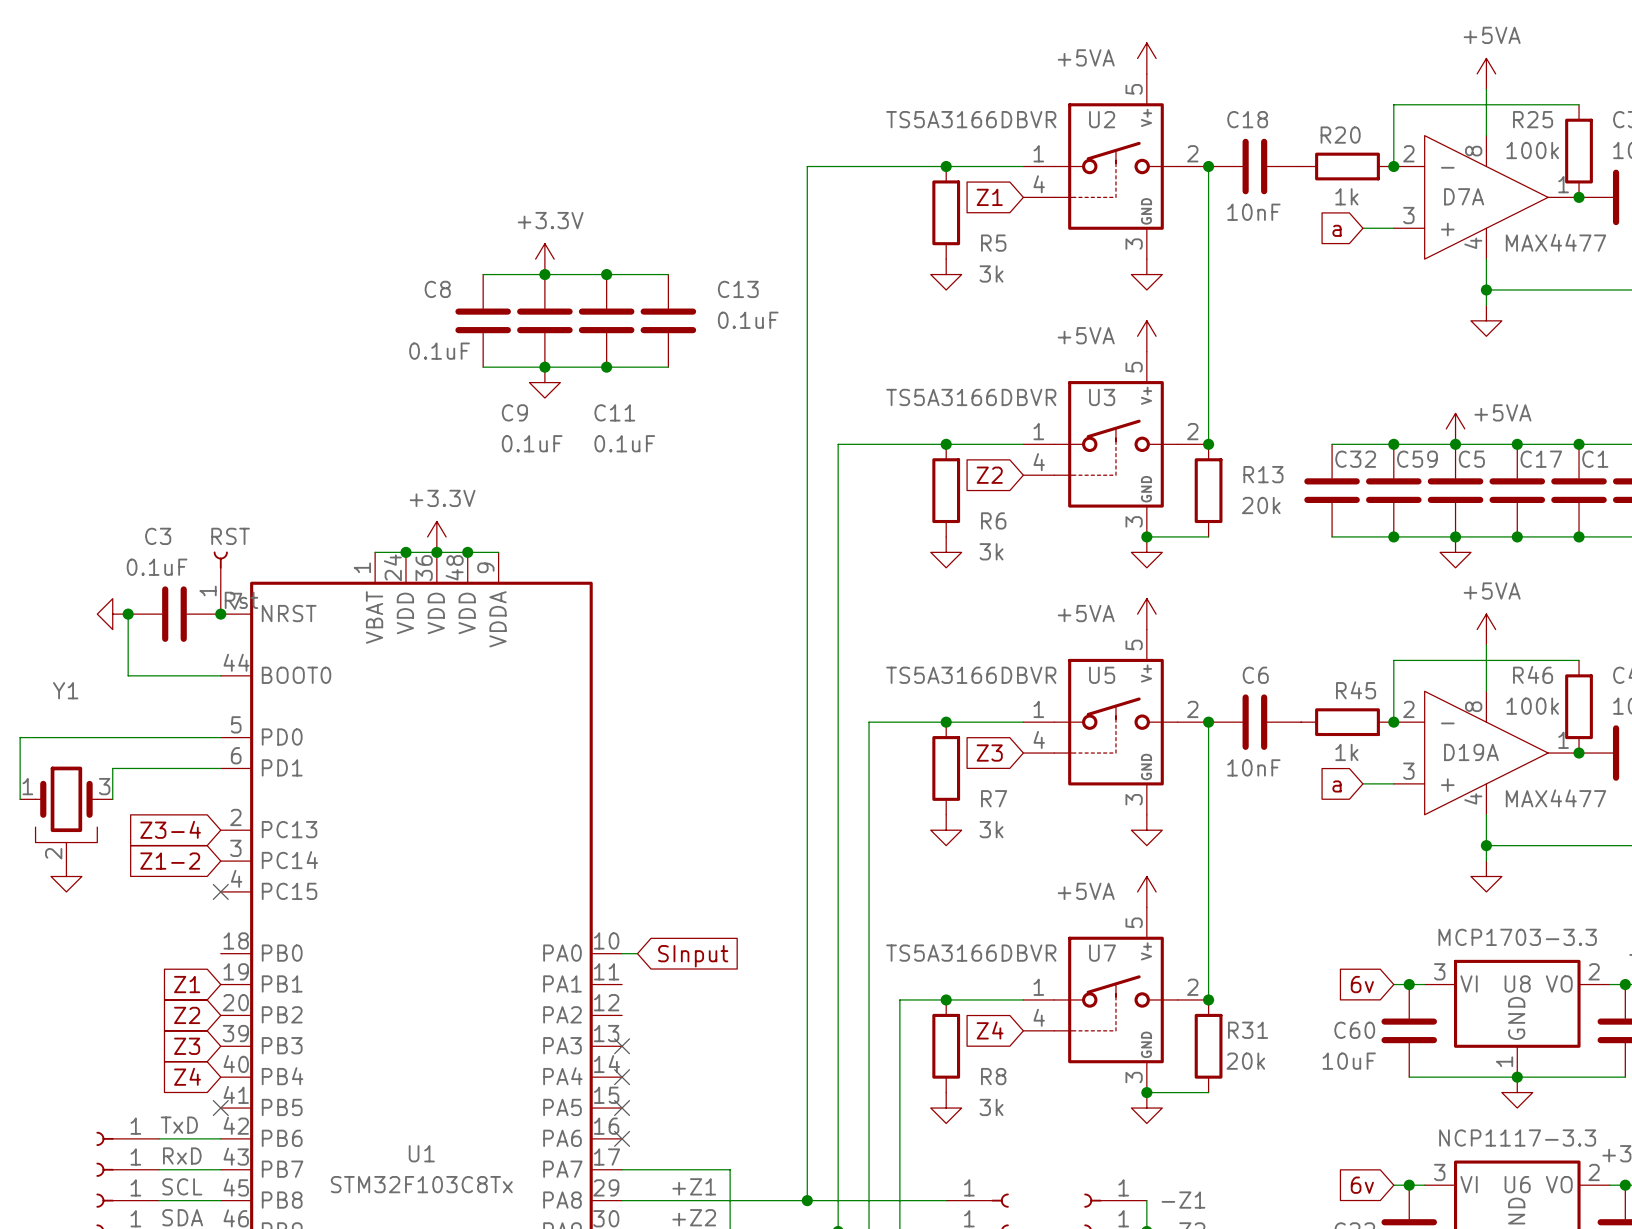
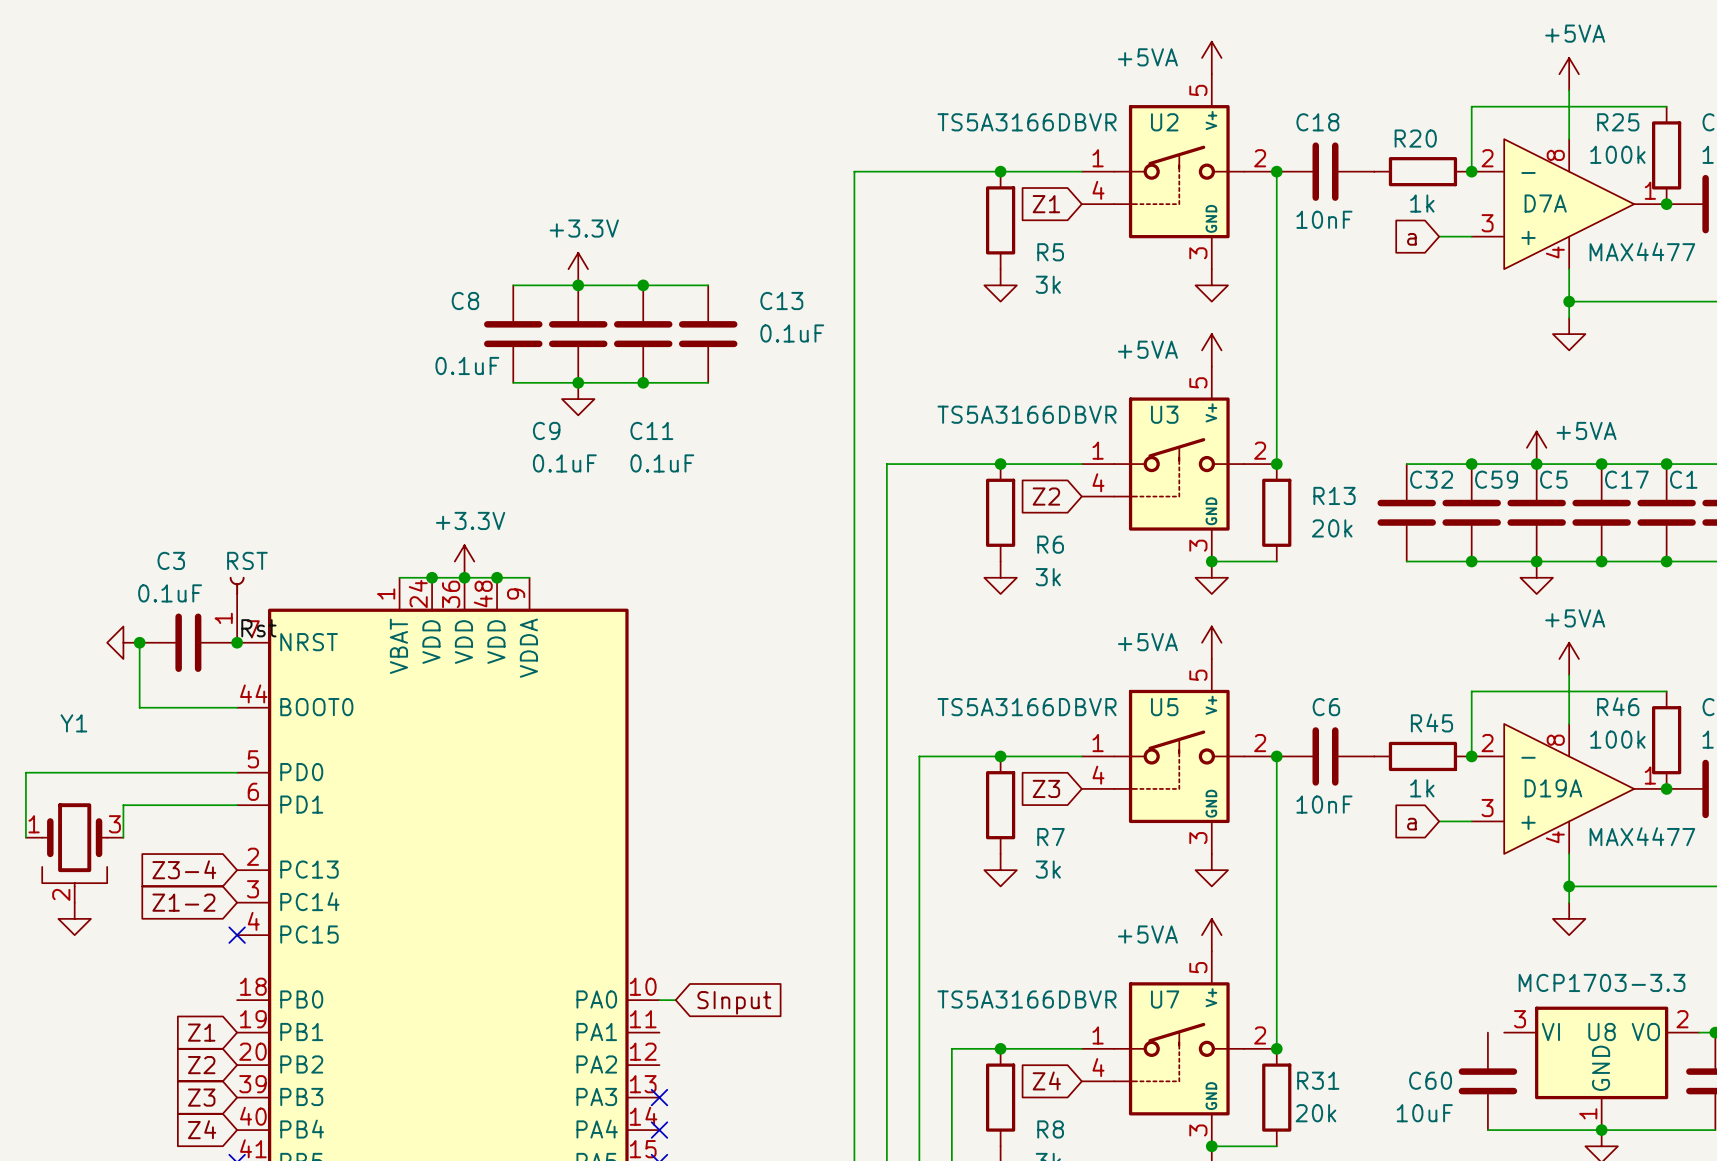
global label: 6v (1362, 984) -> none
wire: (1393, 984) (1424, 984) -> none
junction: (1409, 984) -> none

